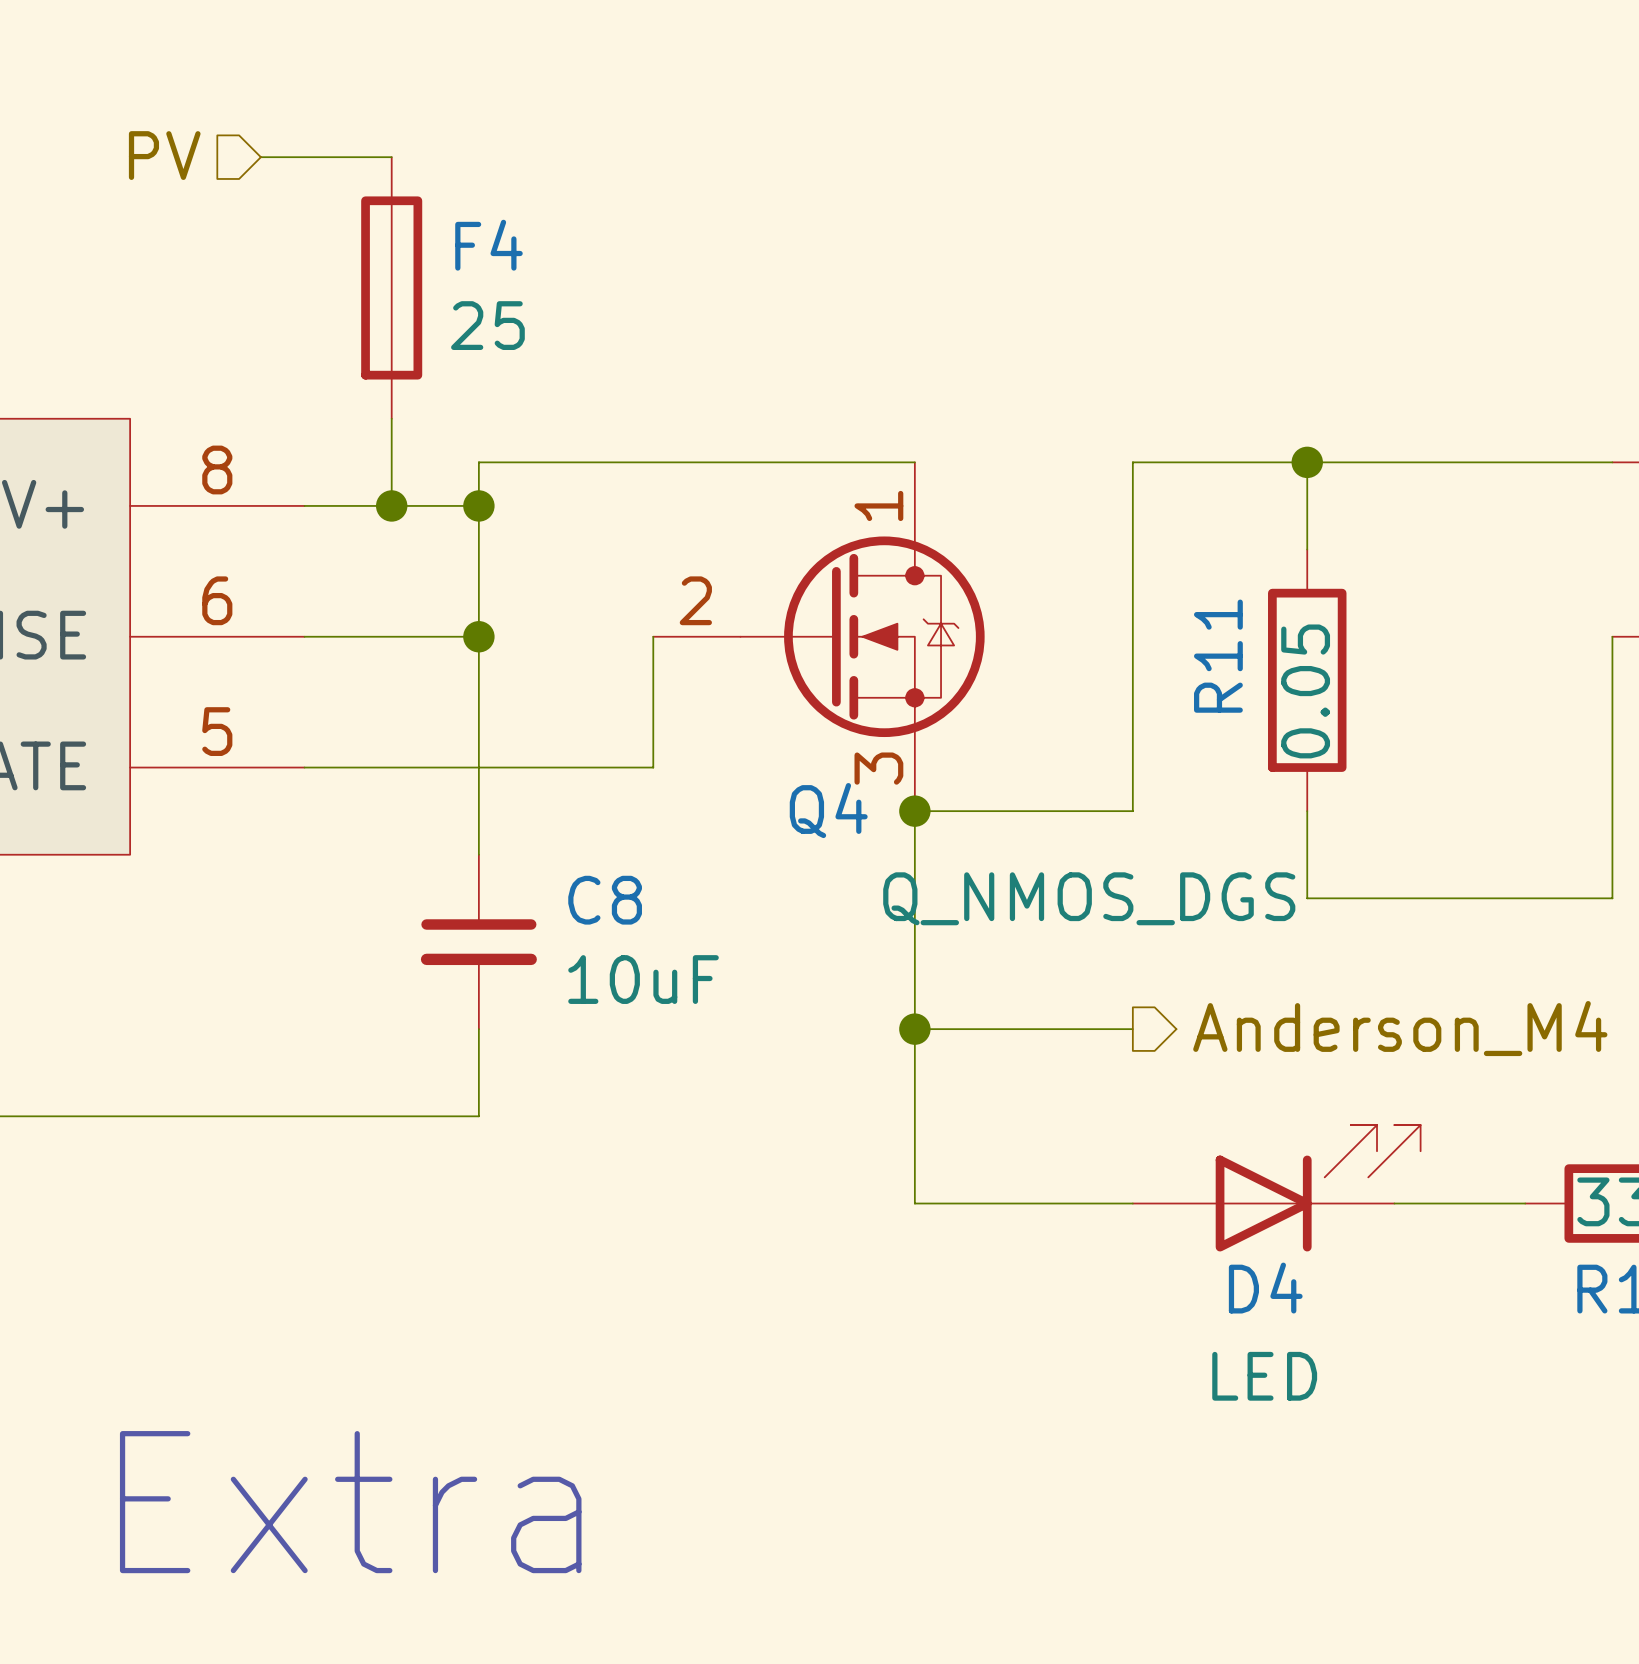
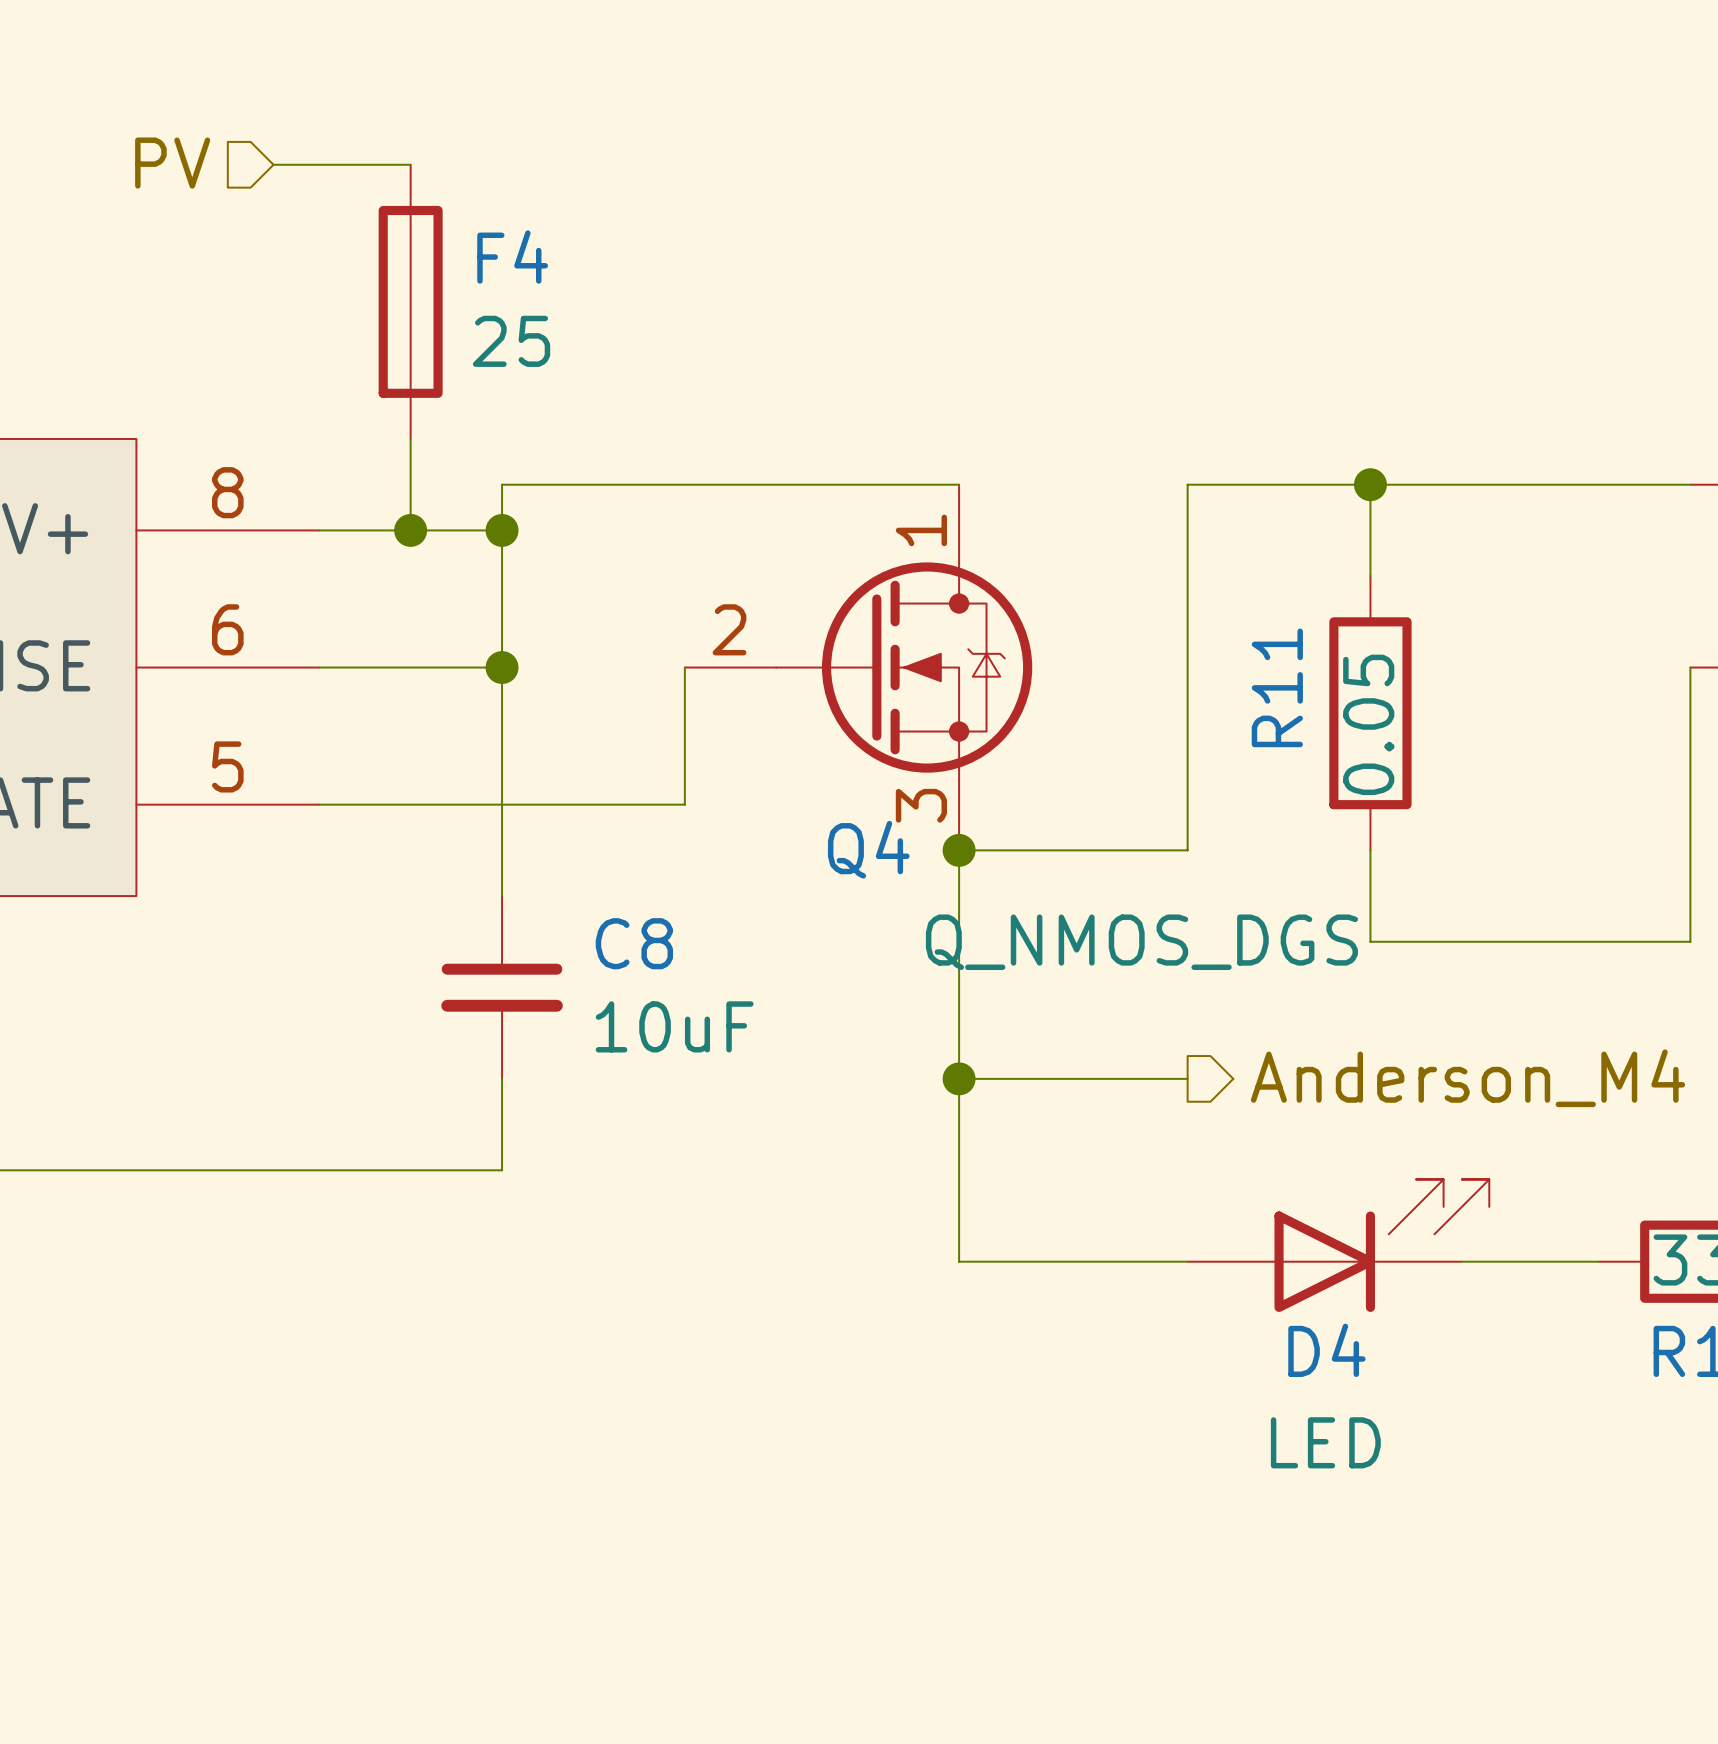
text: Extra (350, 1502) -> none

